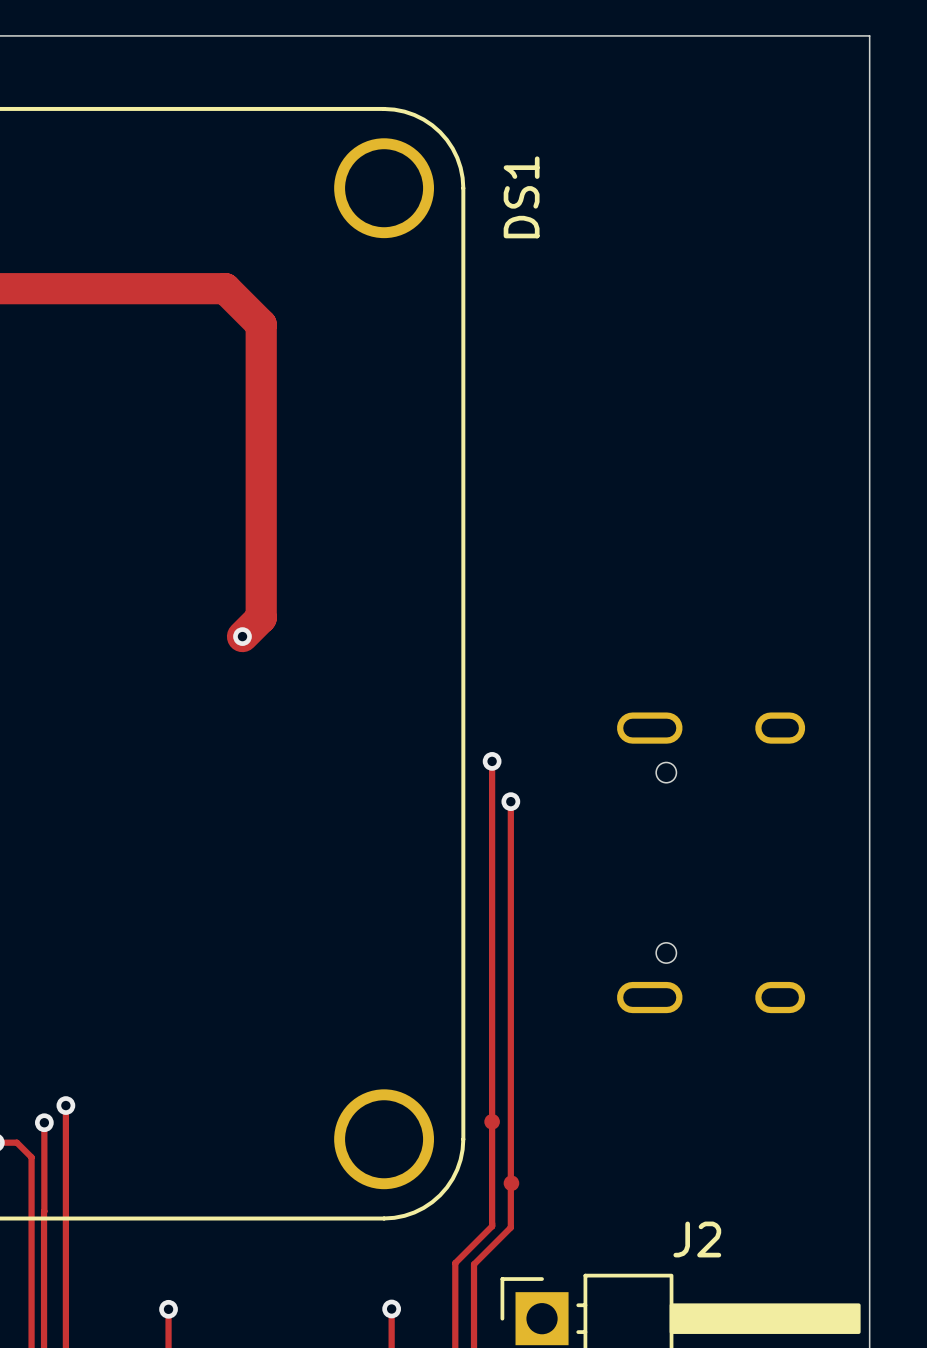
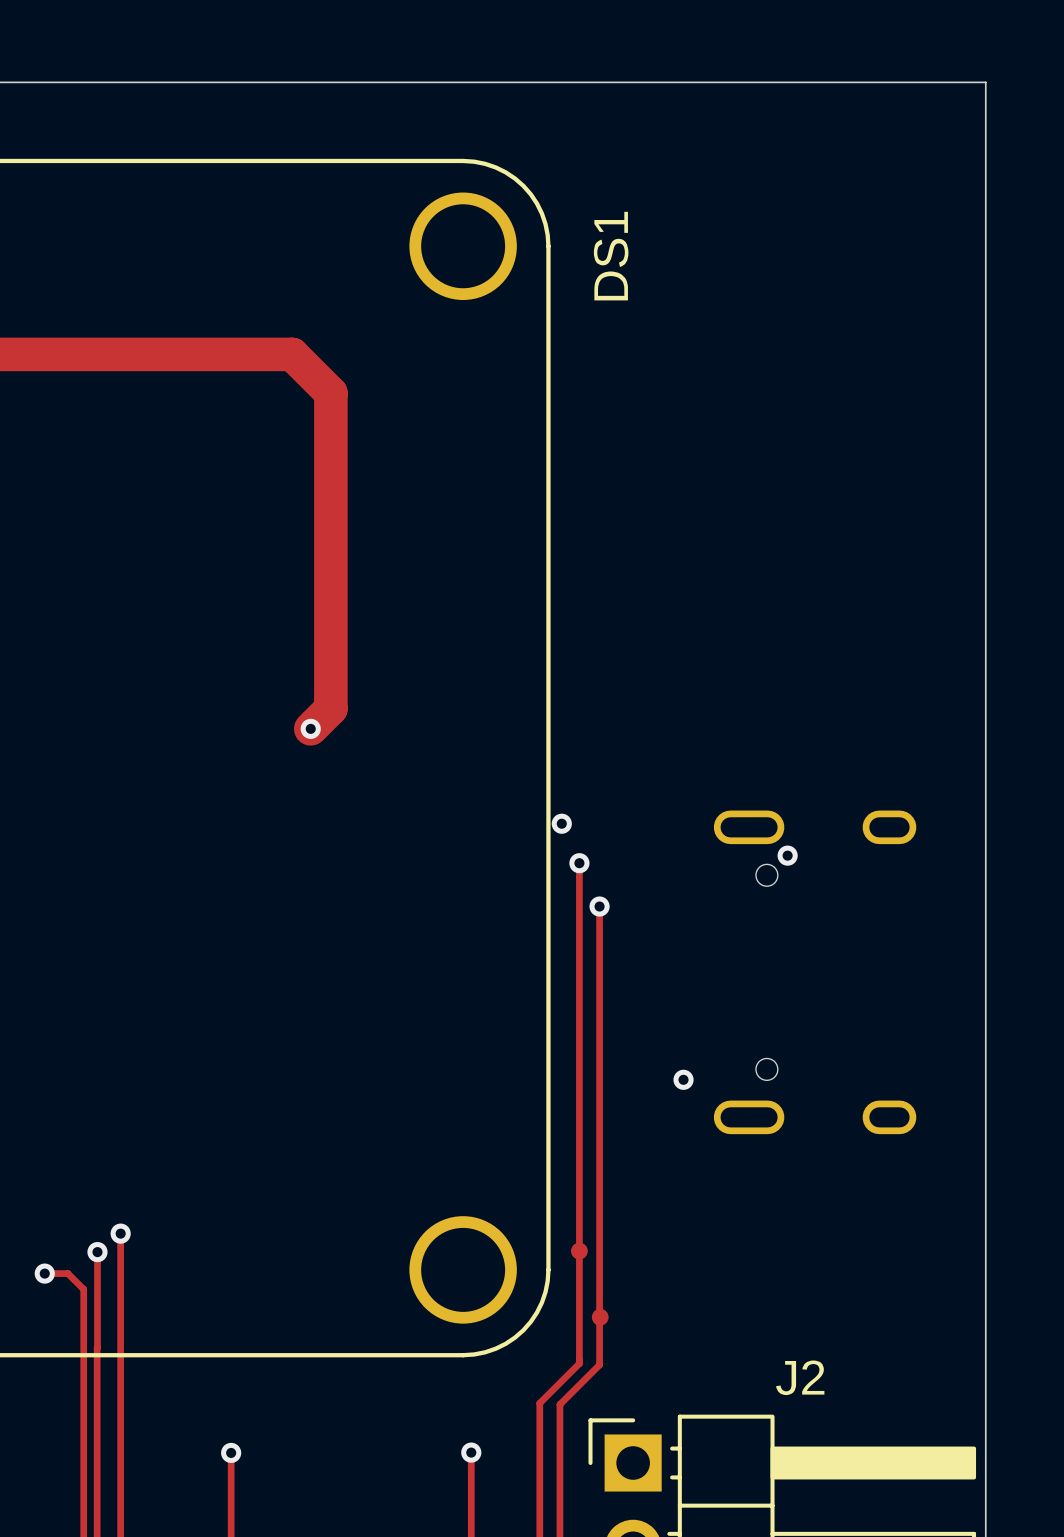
via: none -> (561, 823)
via: none -> (787, 855)
via: none -> (683, 1079)

